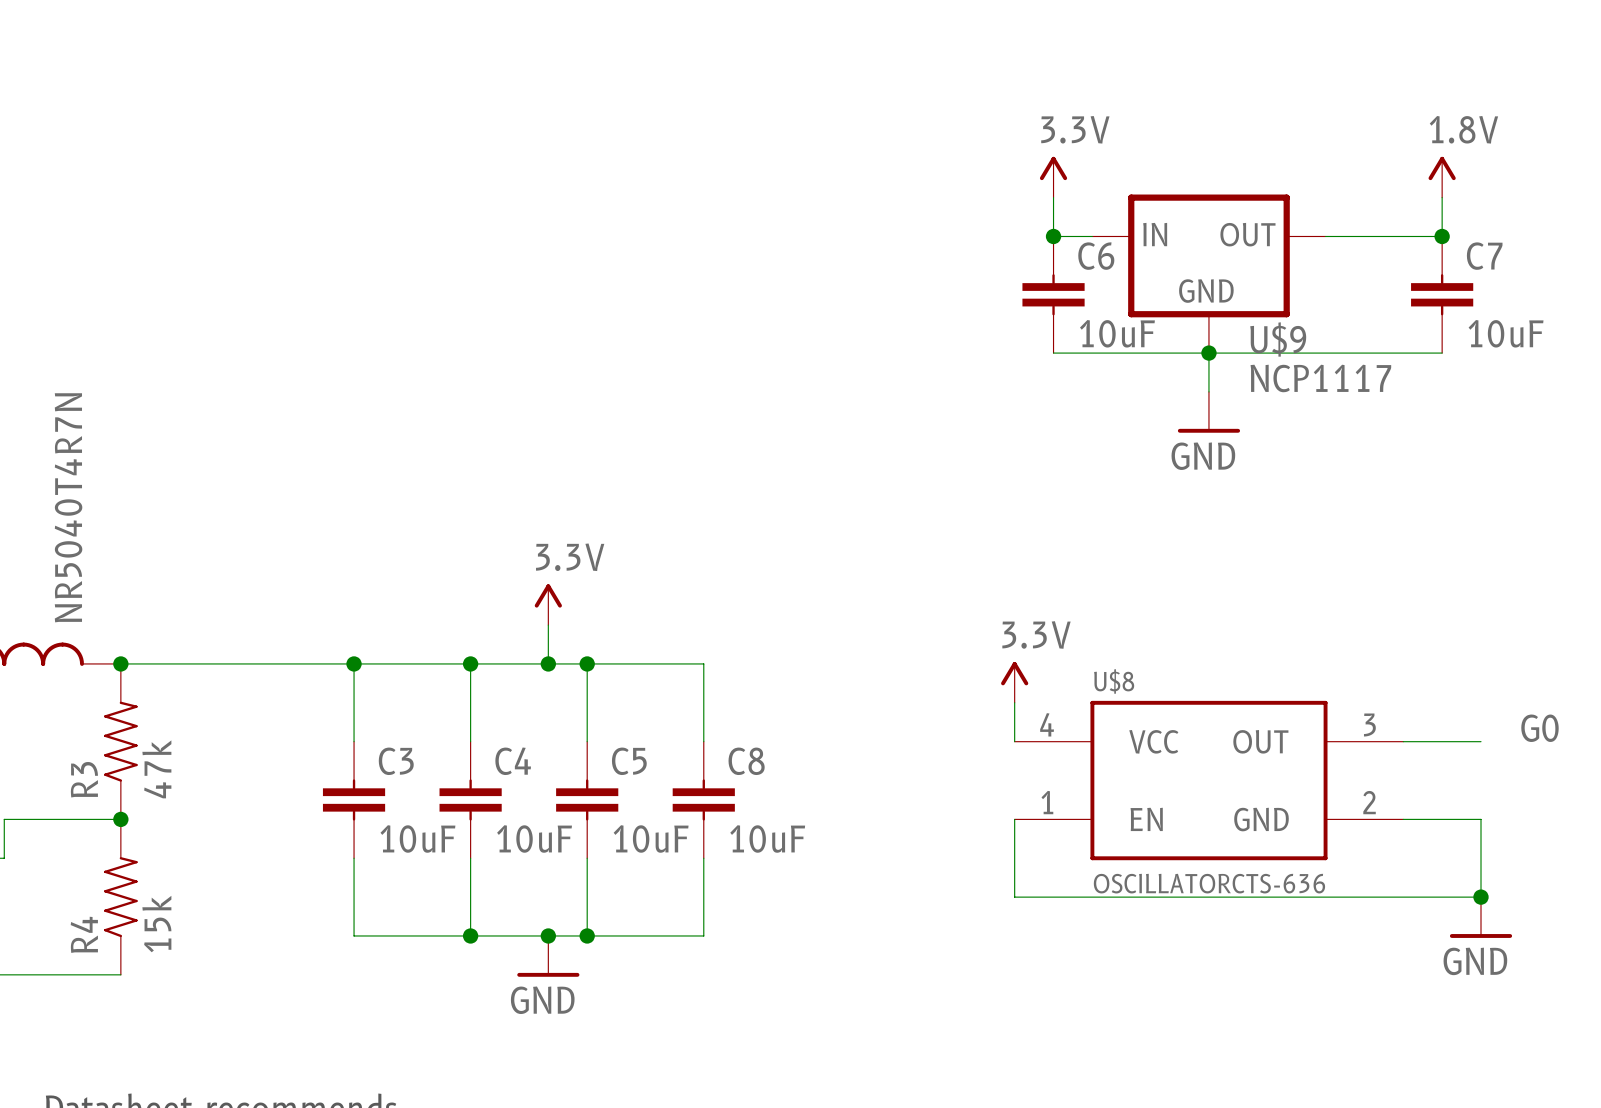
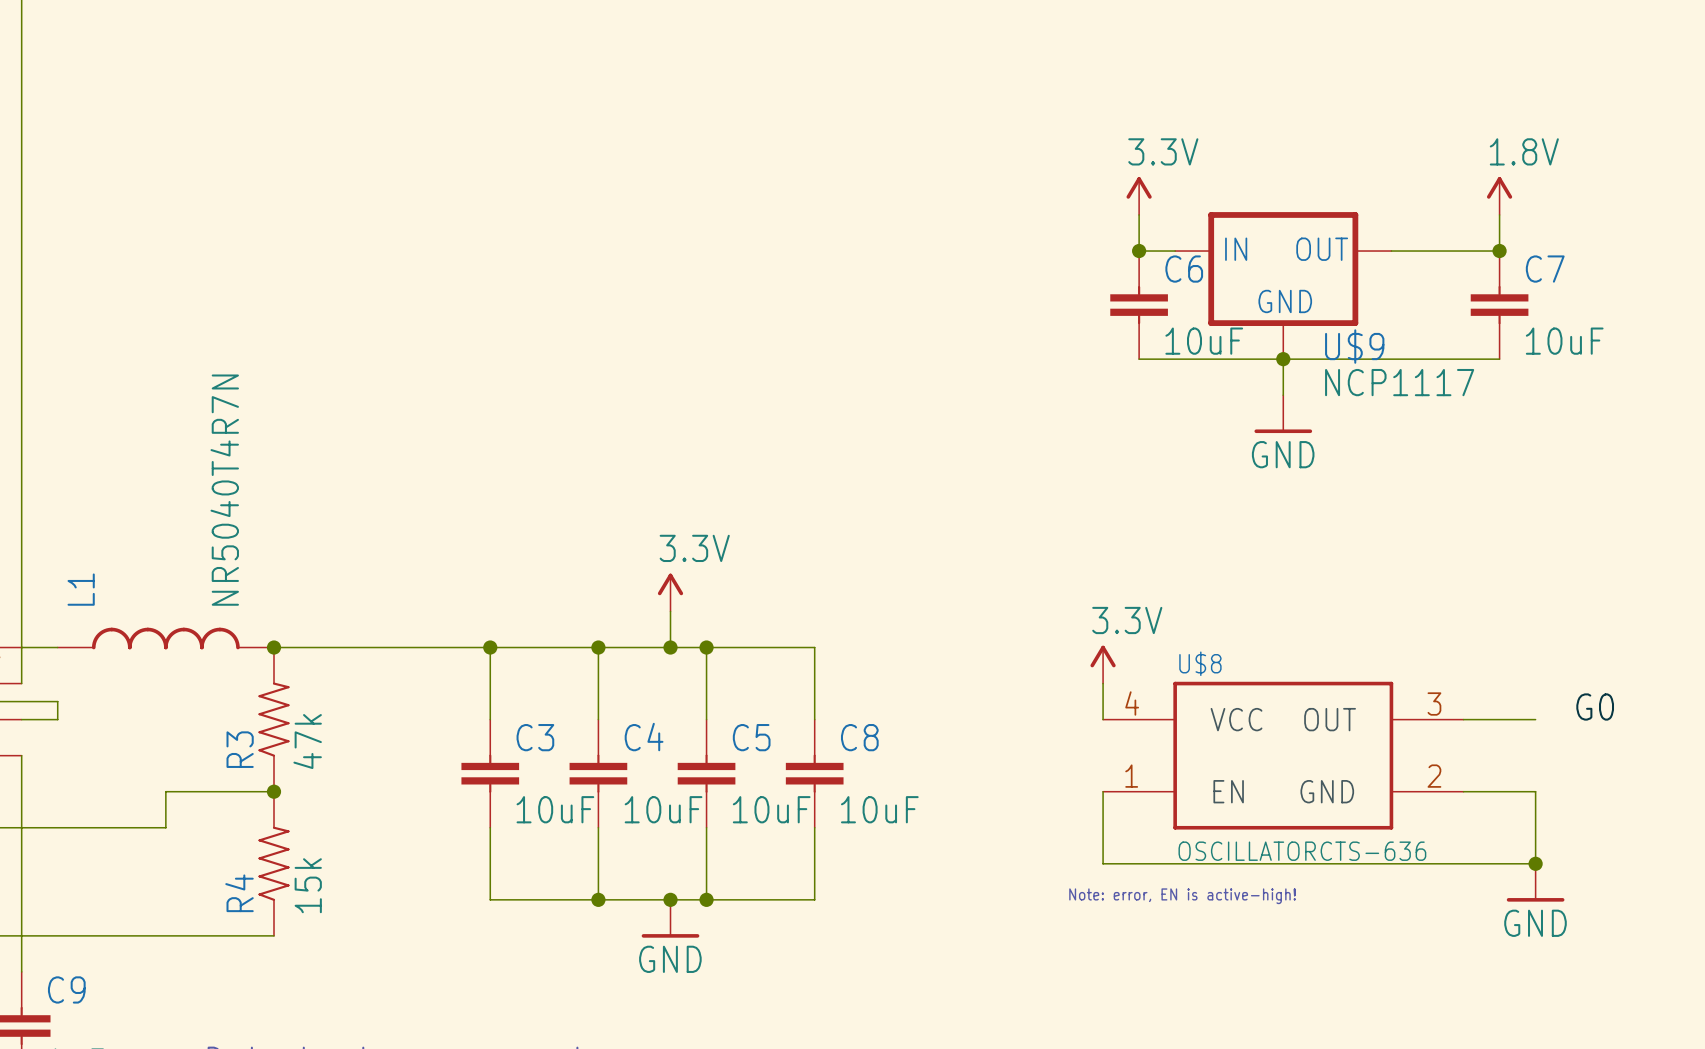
text: none -> Note: error, EN is active-high! (1182, 896)

